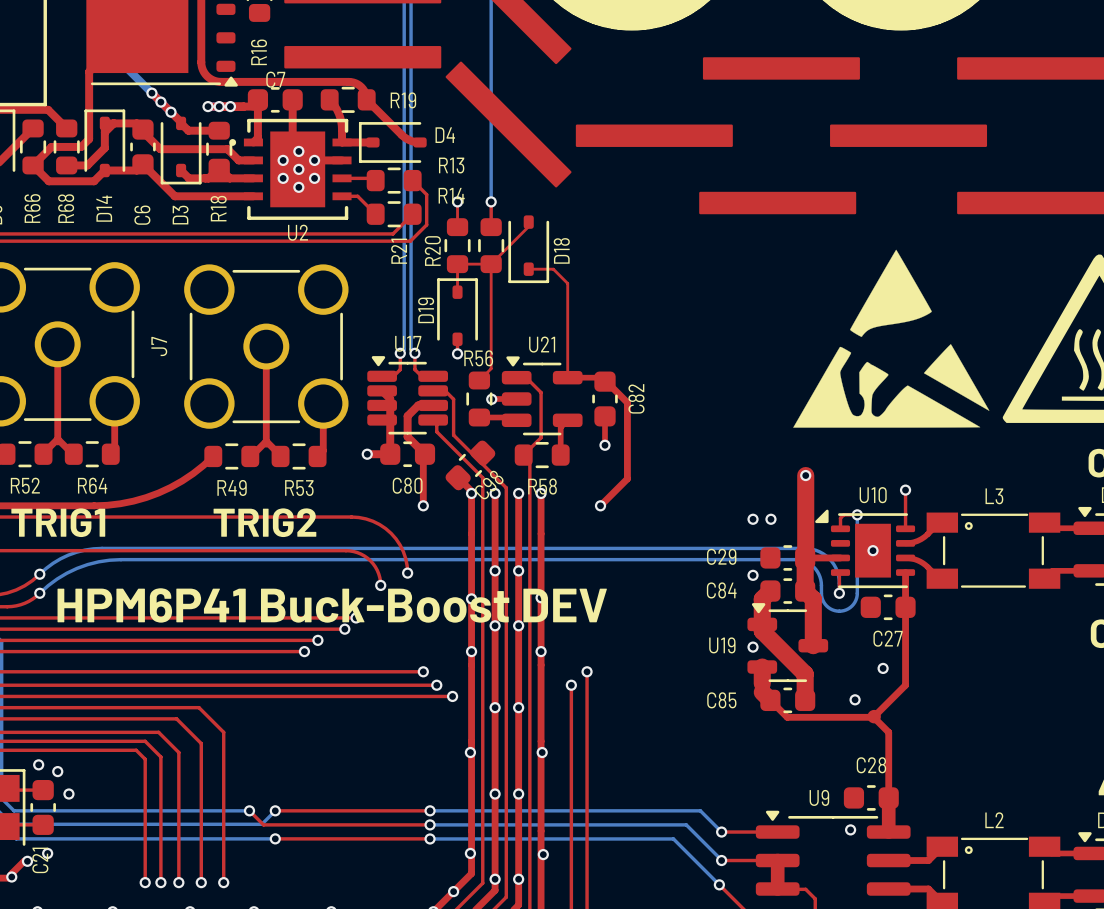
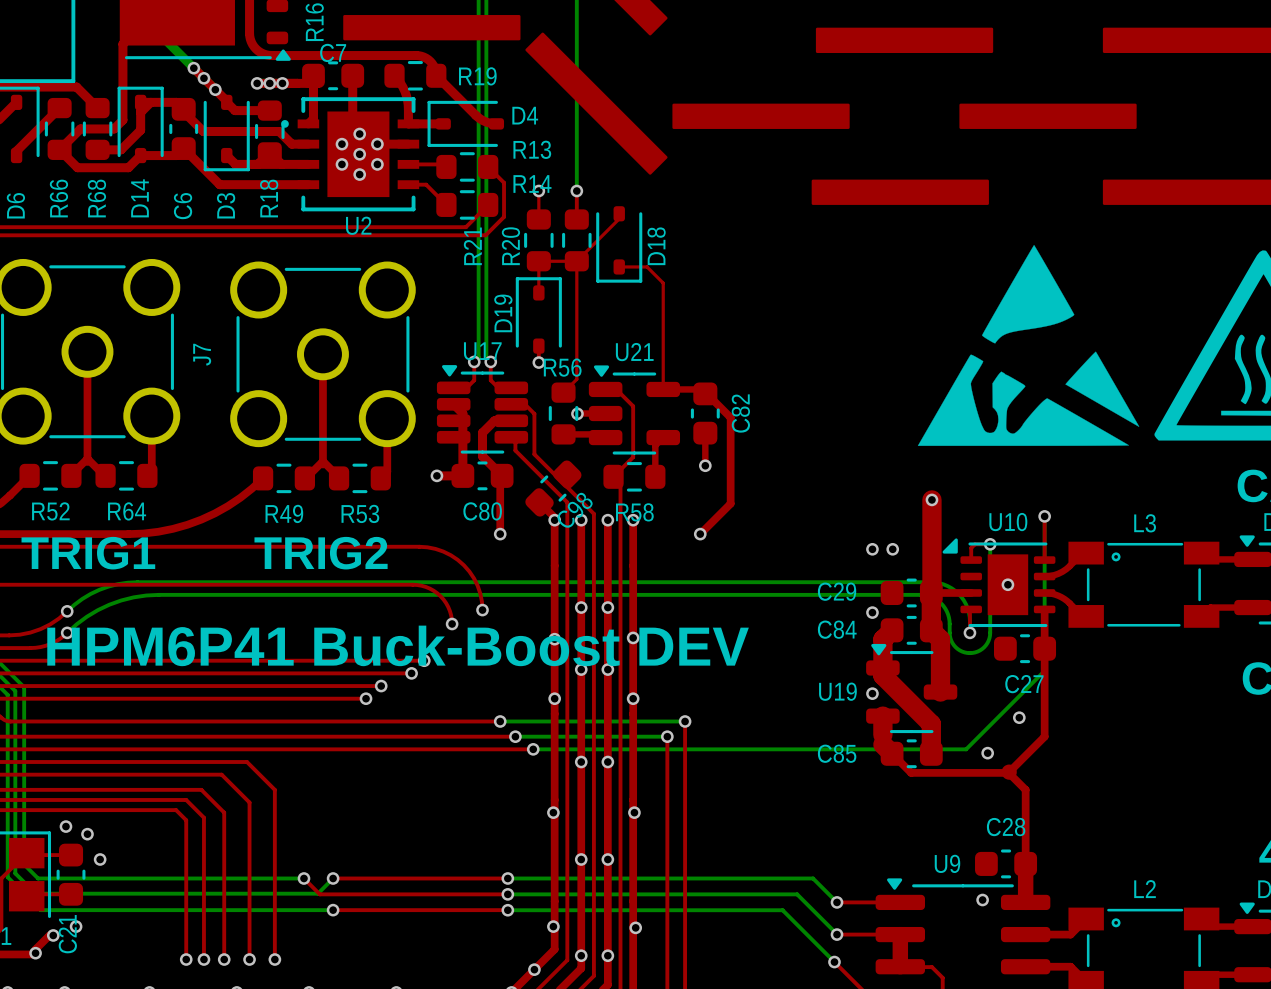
bottom track: none -> (1044, 516) (1044, 670) (966, 749) (533, 749)
bottom track: none -> (500, 721) (685, 721)
bottom track: none -> (515, 736) (667, 736)

